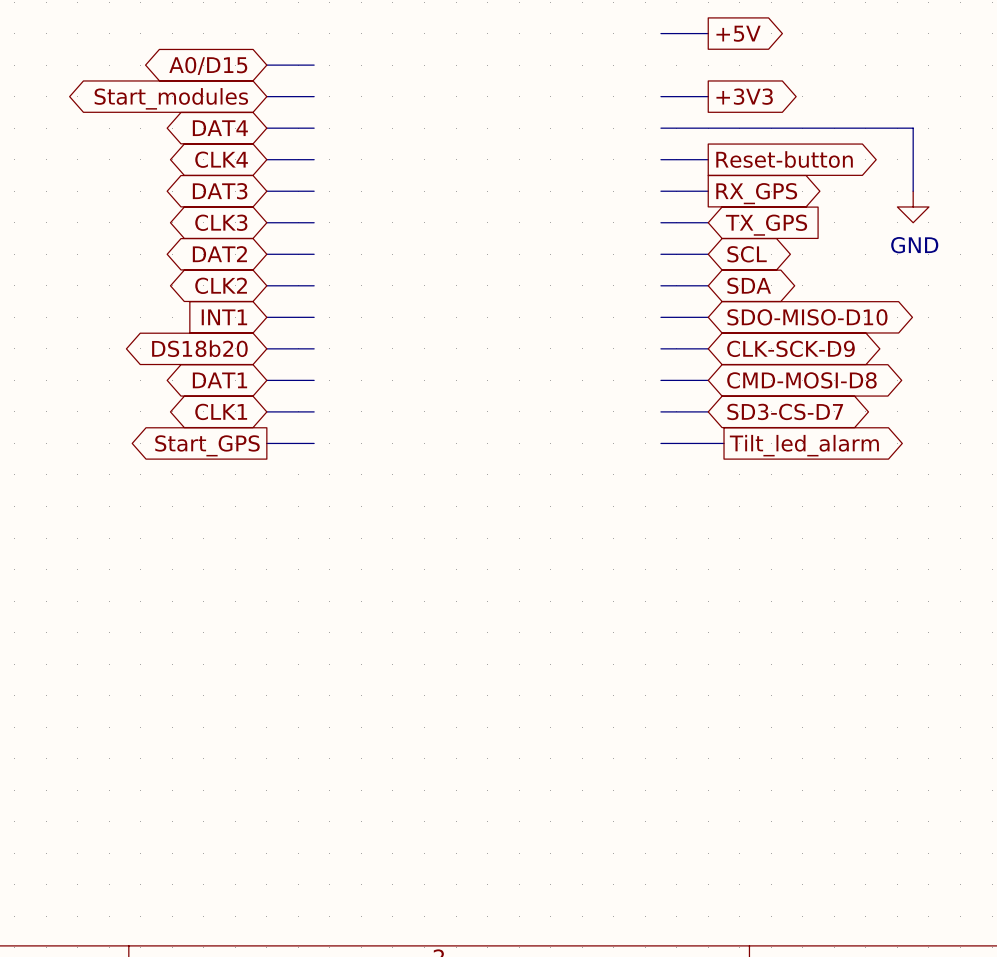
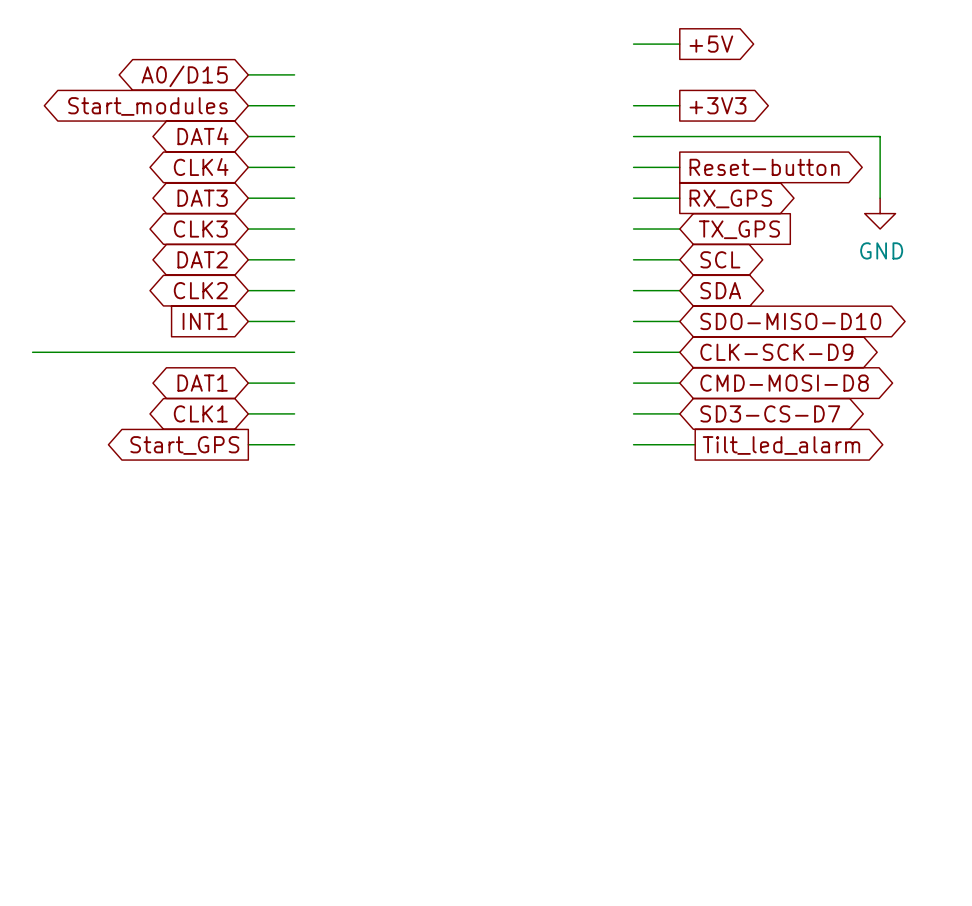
wire: none -> (32, 352) (248, 352)
global label: DS18b20 (199, 348) -> none

